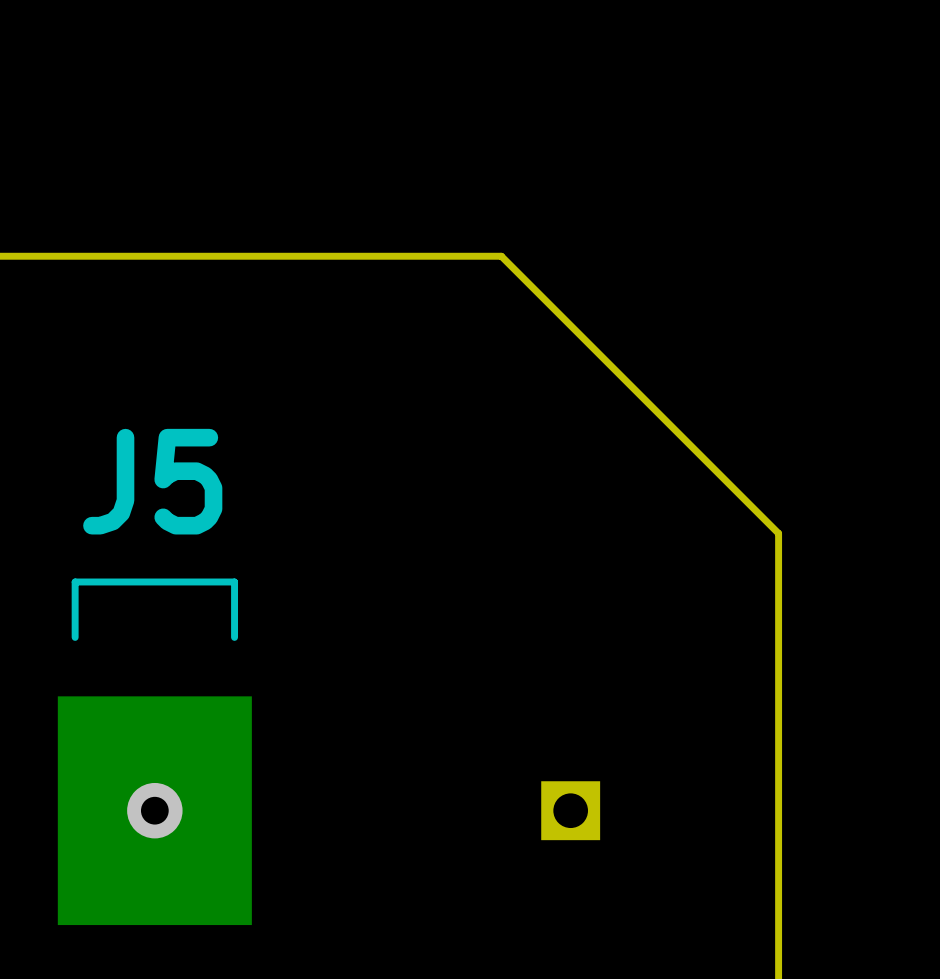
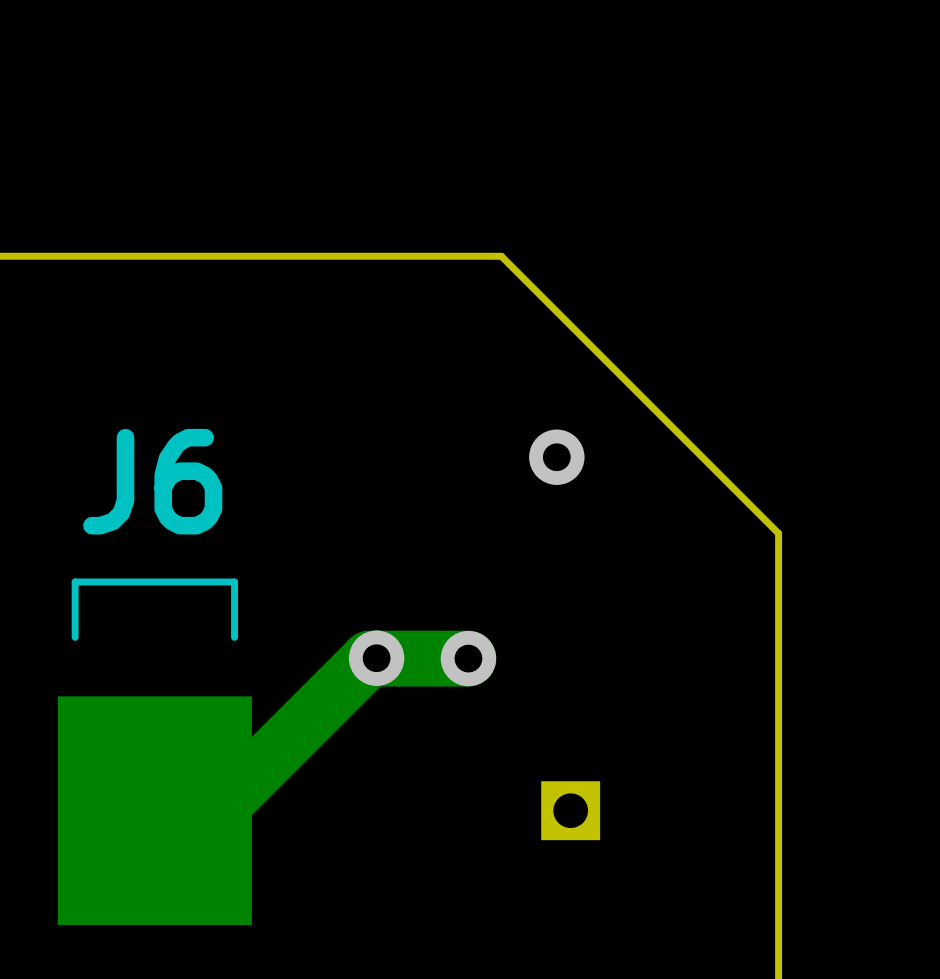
via: none -> (556, 457)
J5 name: J5 (152, 481) -> J6 (152, 481)
via: none -> (376, 658)
track: none -> (468, 658) (369, 658) (217, 810) (154, 810)
via: none -> (468, 658)
via: (154, 810) -> none

